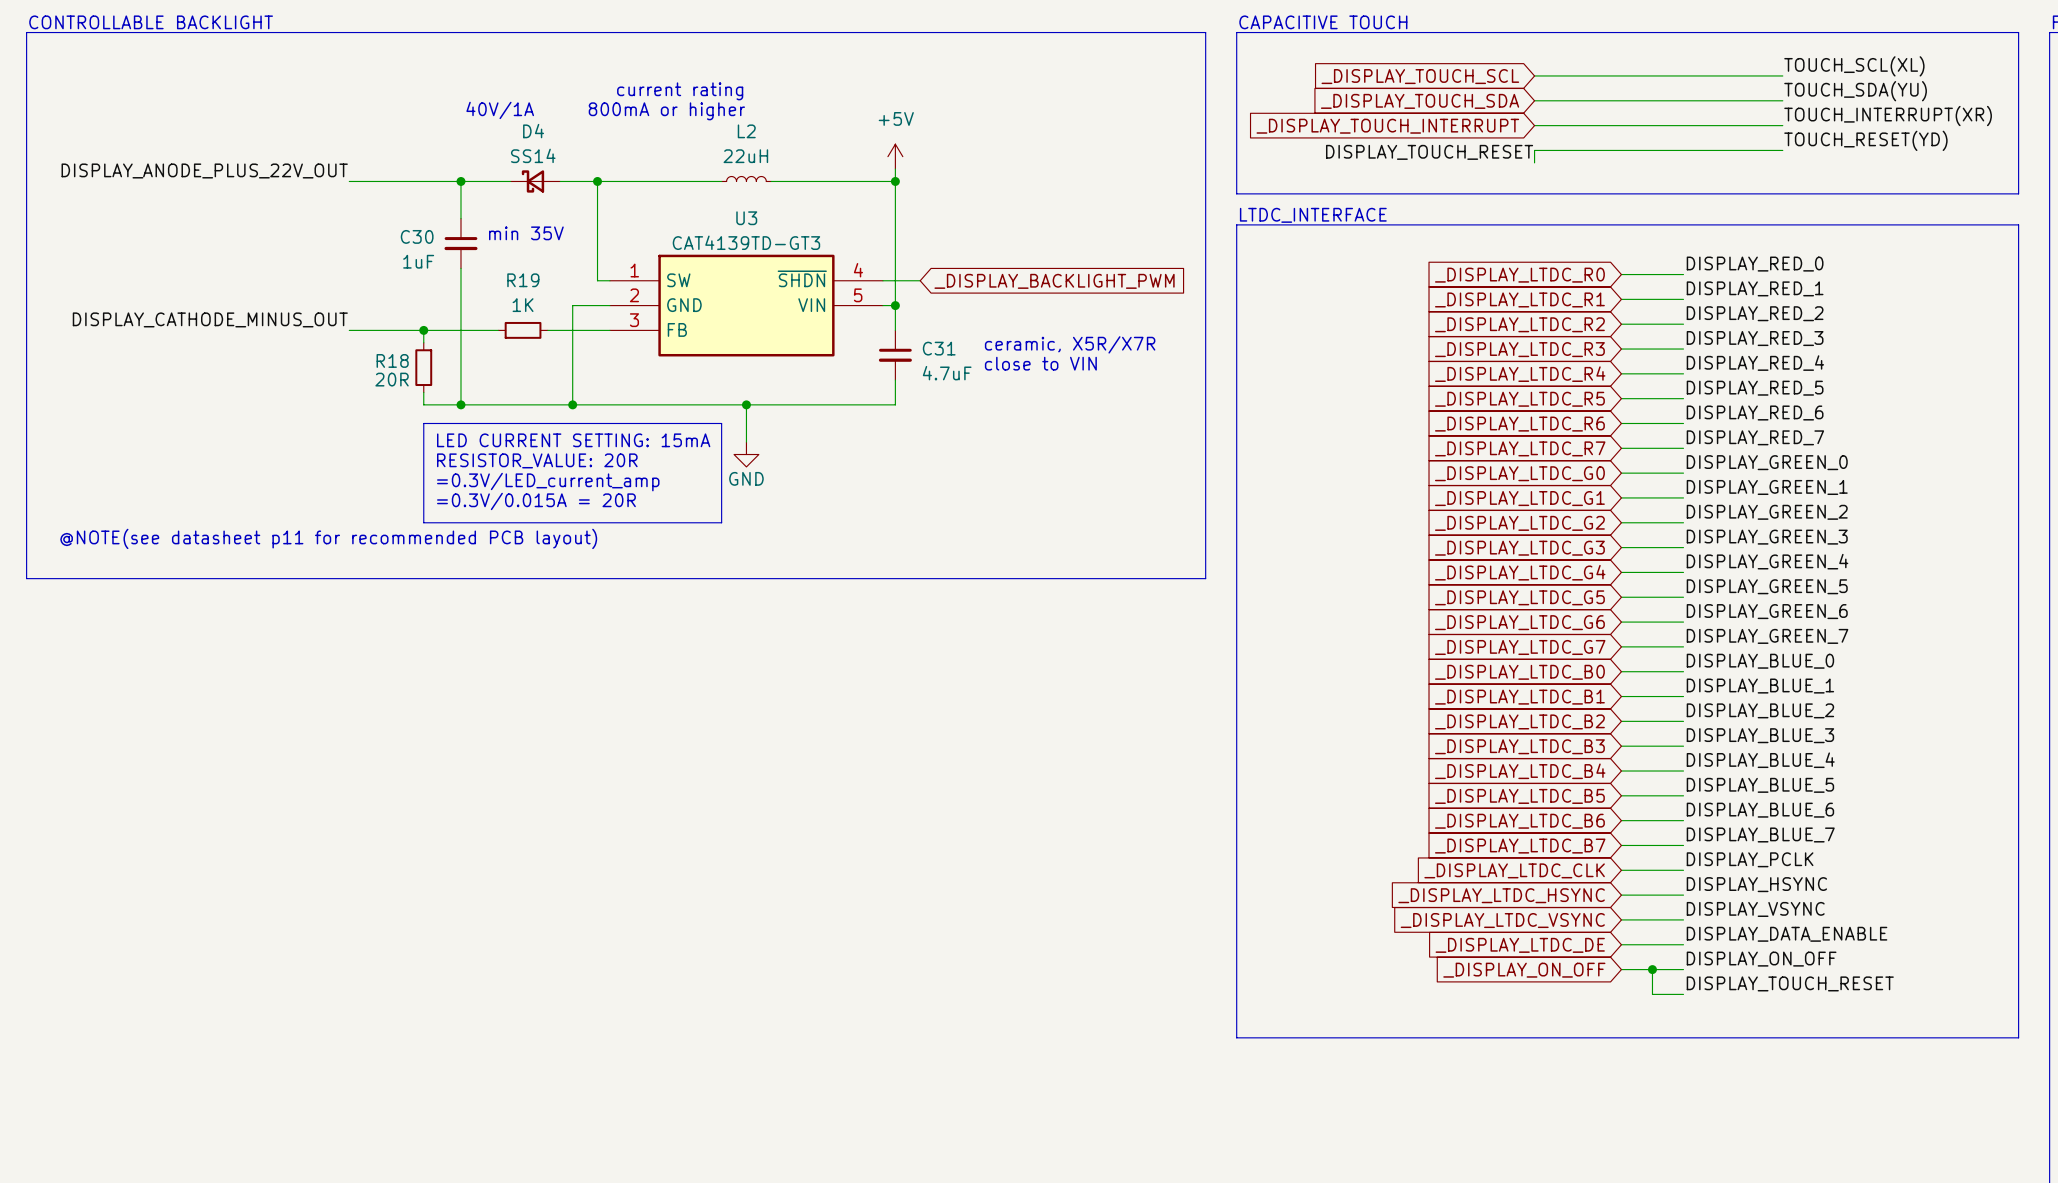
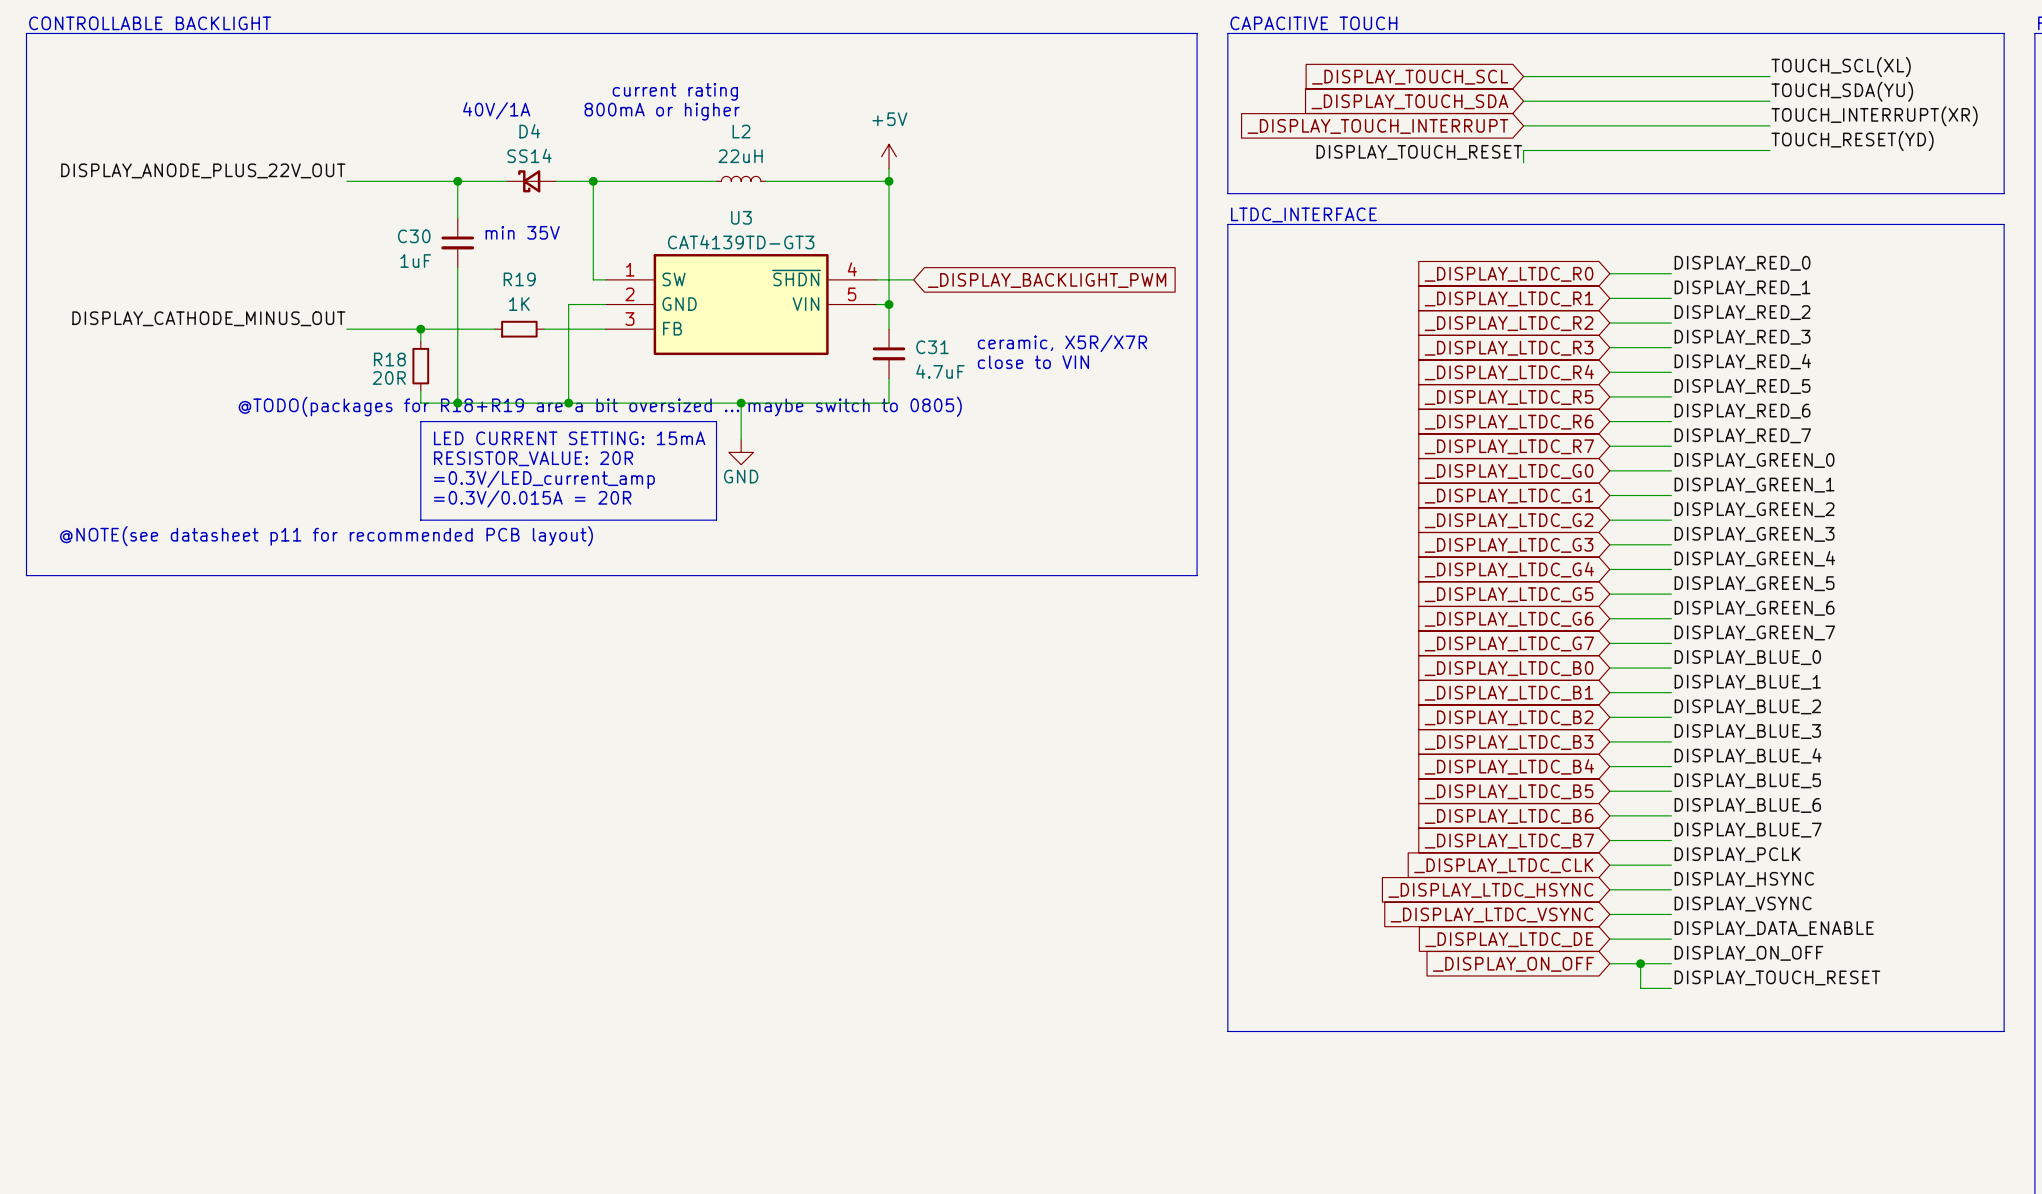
text: none -> @TODO(packages for R18+R19 are a bit oversized … maybe switch to 0805) (600, 406)

